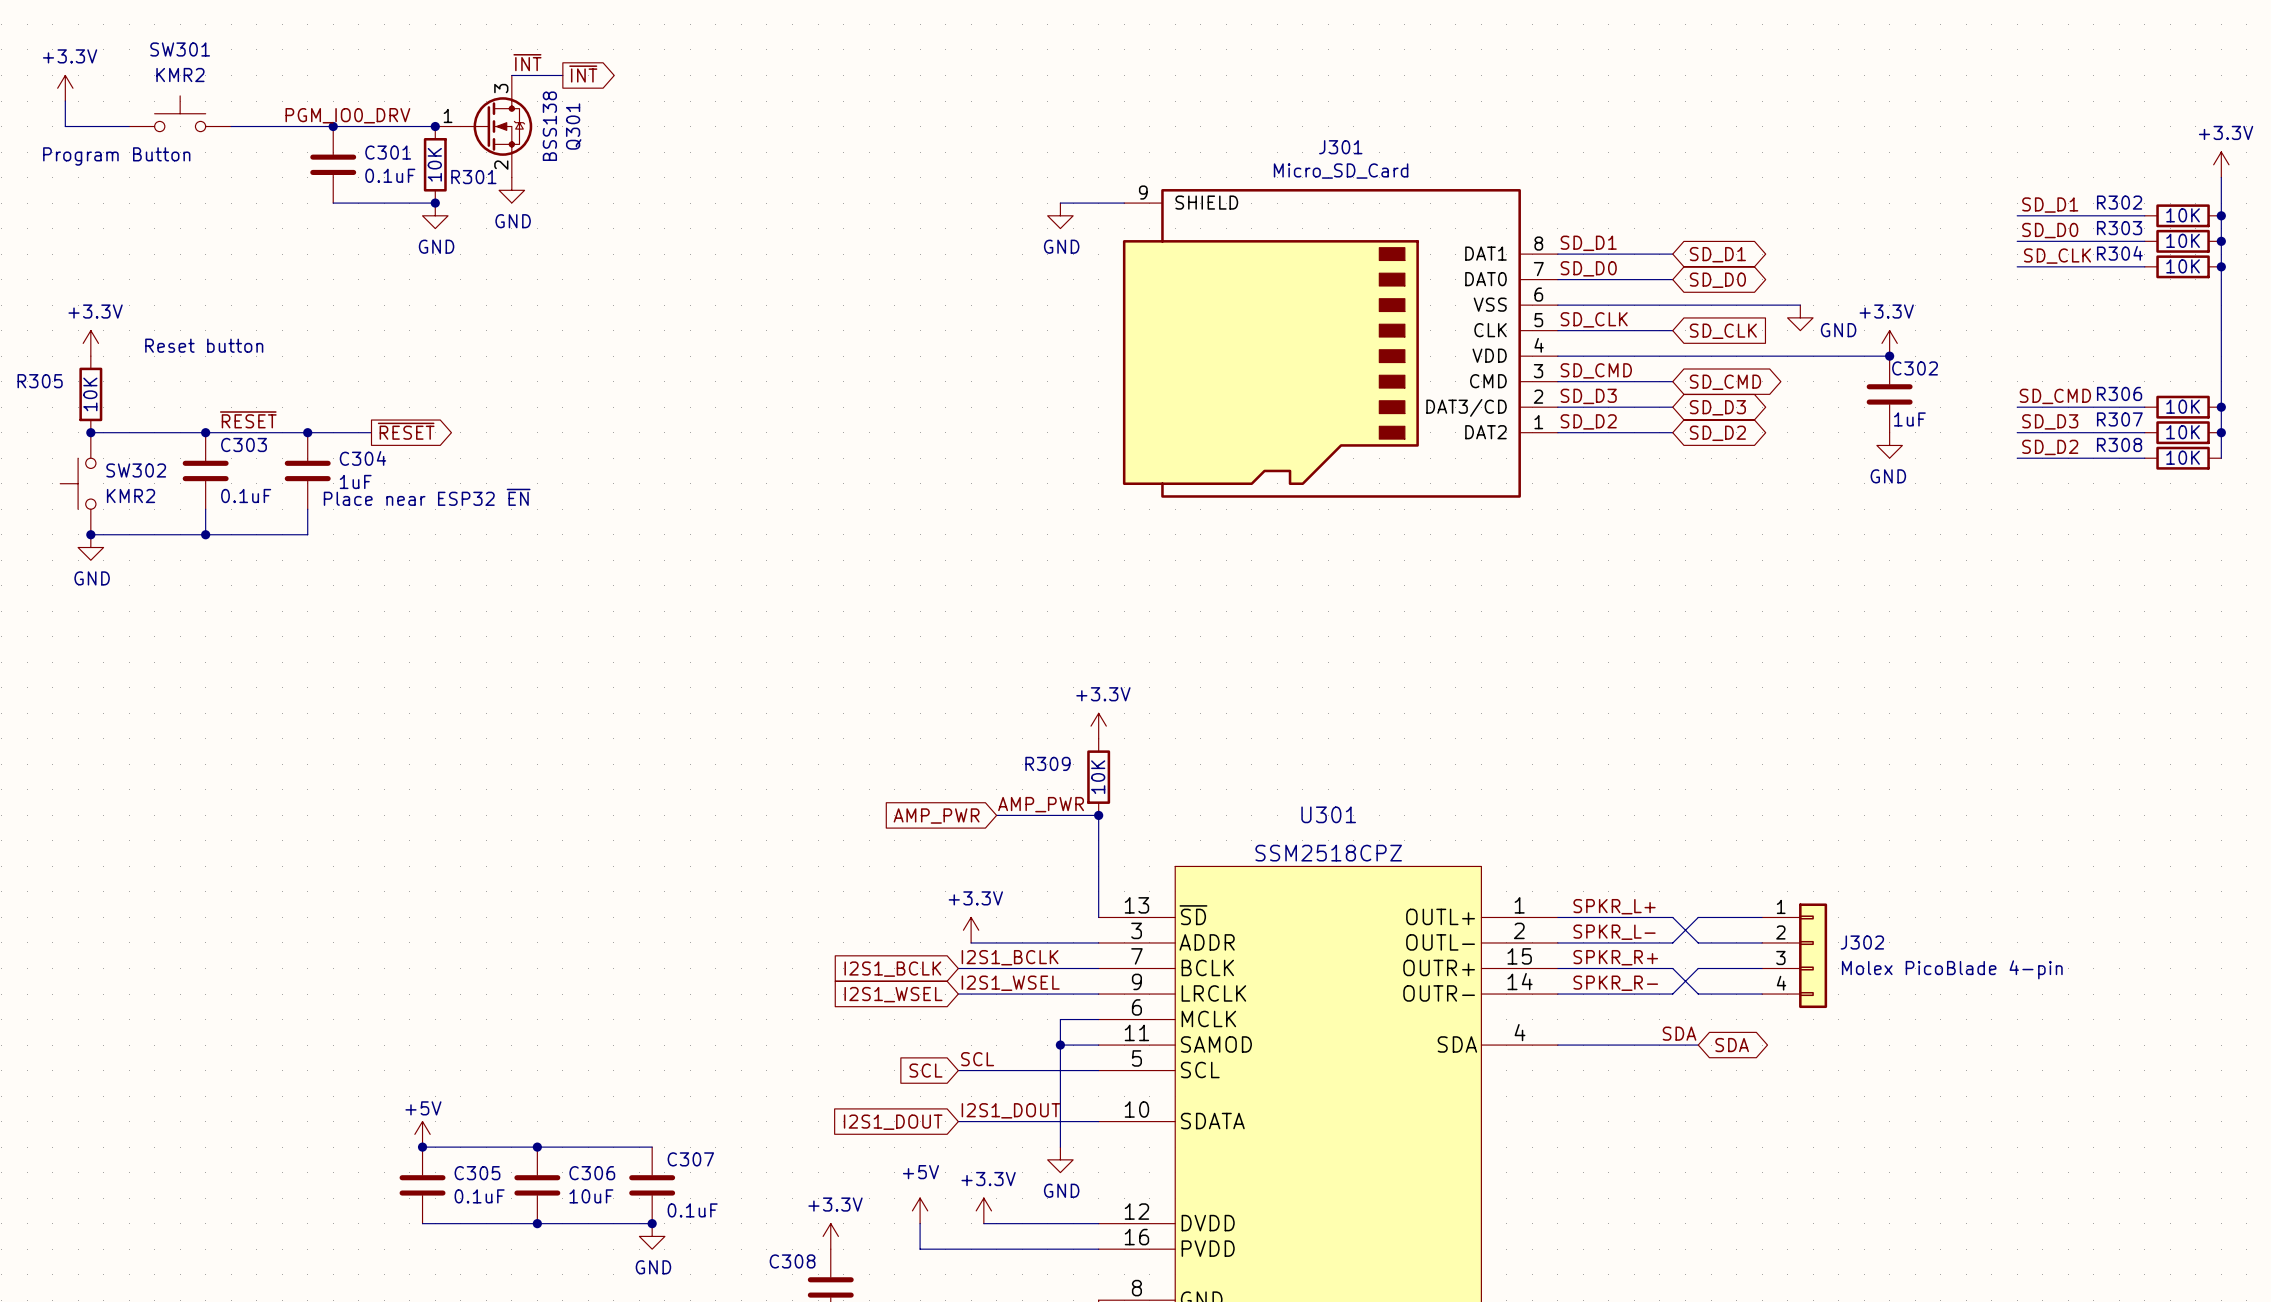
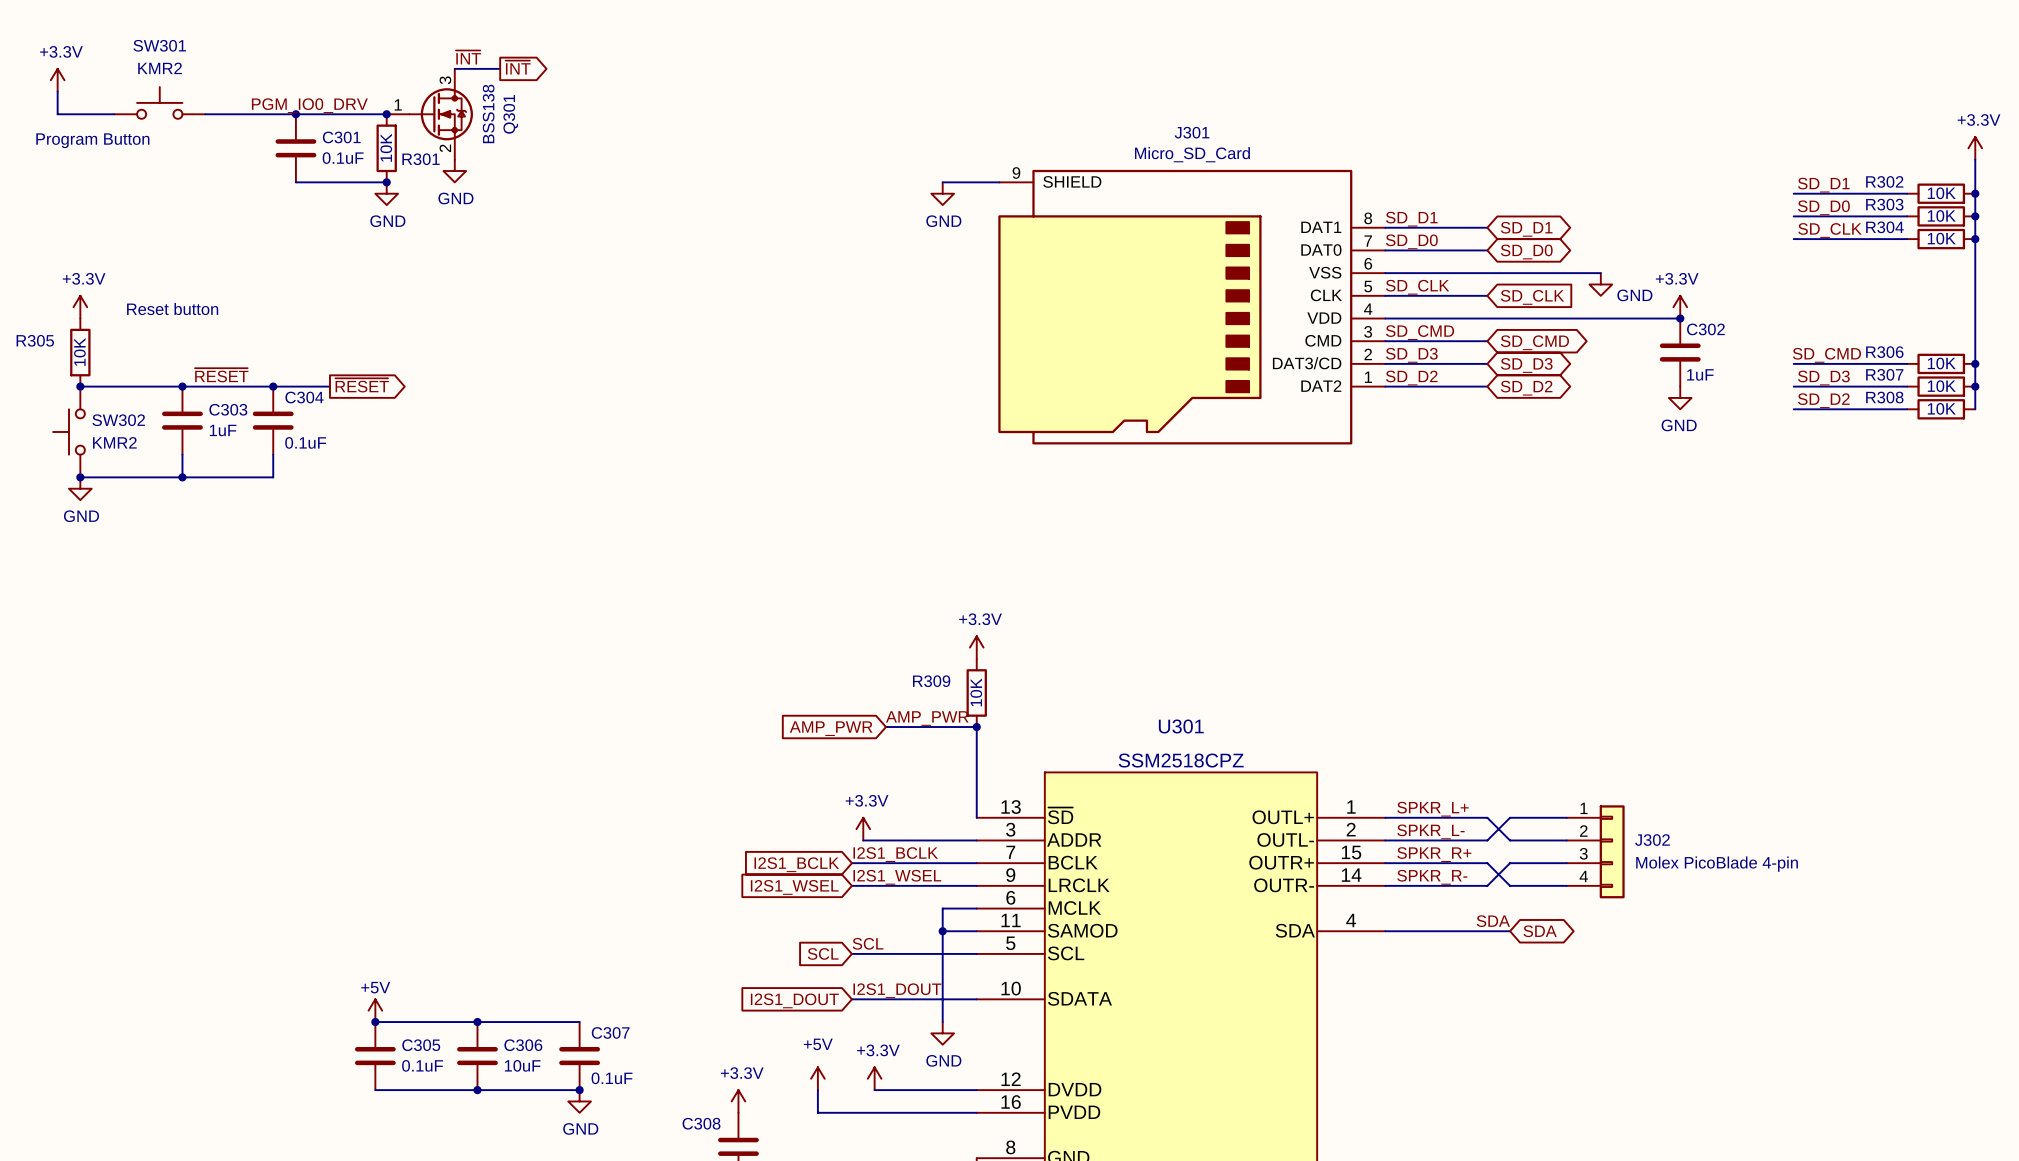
C303 name position: C303 (244, 444) -> C303 (228, 409)
C304 name position: C304 (362, 458) -> C304 (304, 397)
C304 value: 1uF (355, 481) -> 0.1uF (305, 442)
C303 value: 0.1uF (246, 496) -> 1uF (223, 430)
text: Place near ESP32 ~{EN} (427, 497) -> none

